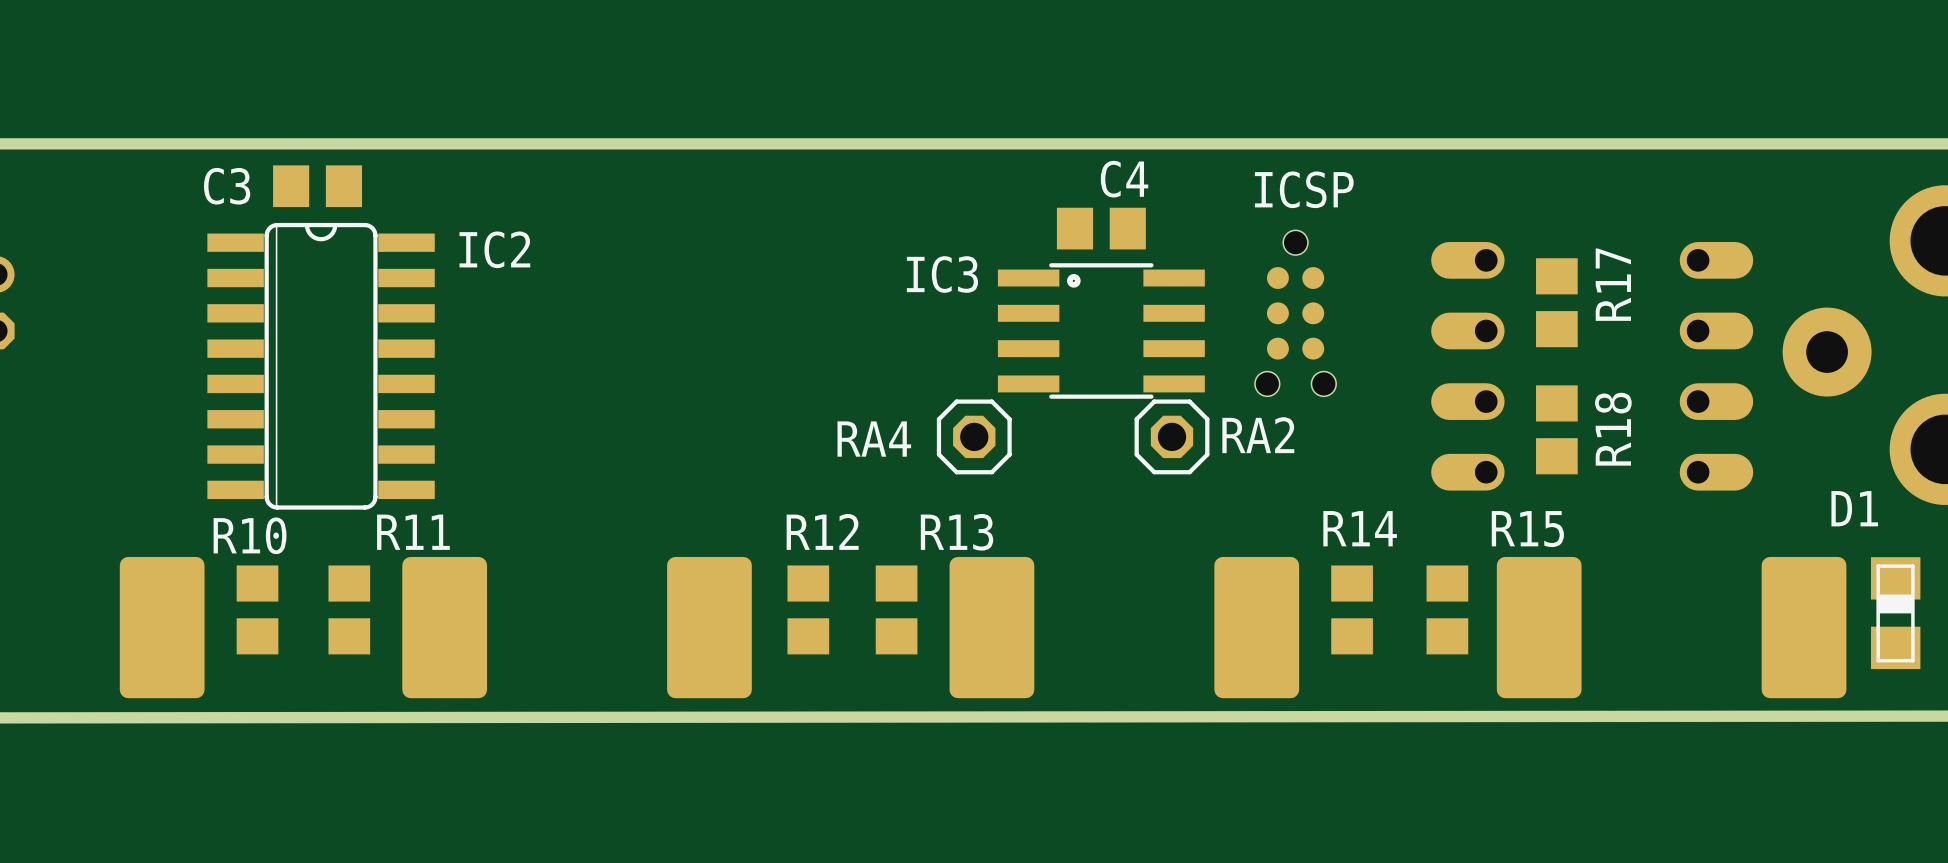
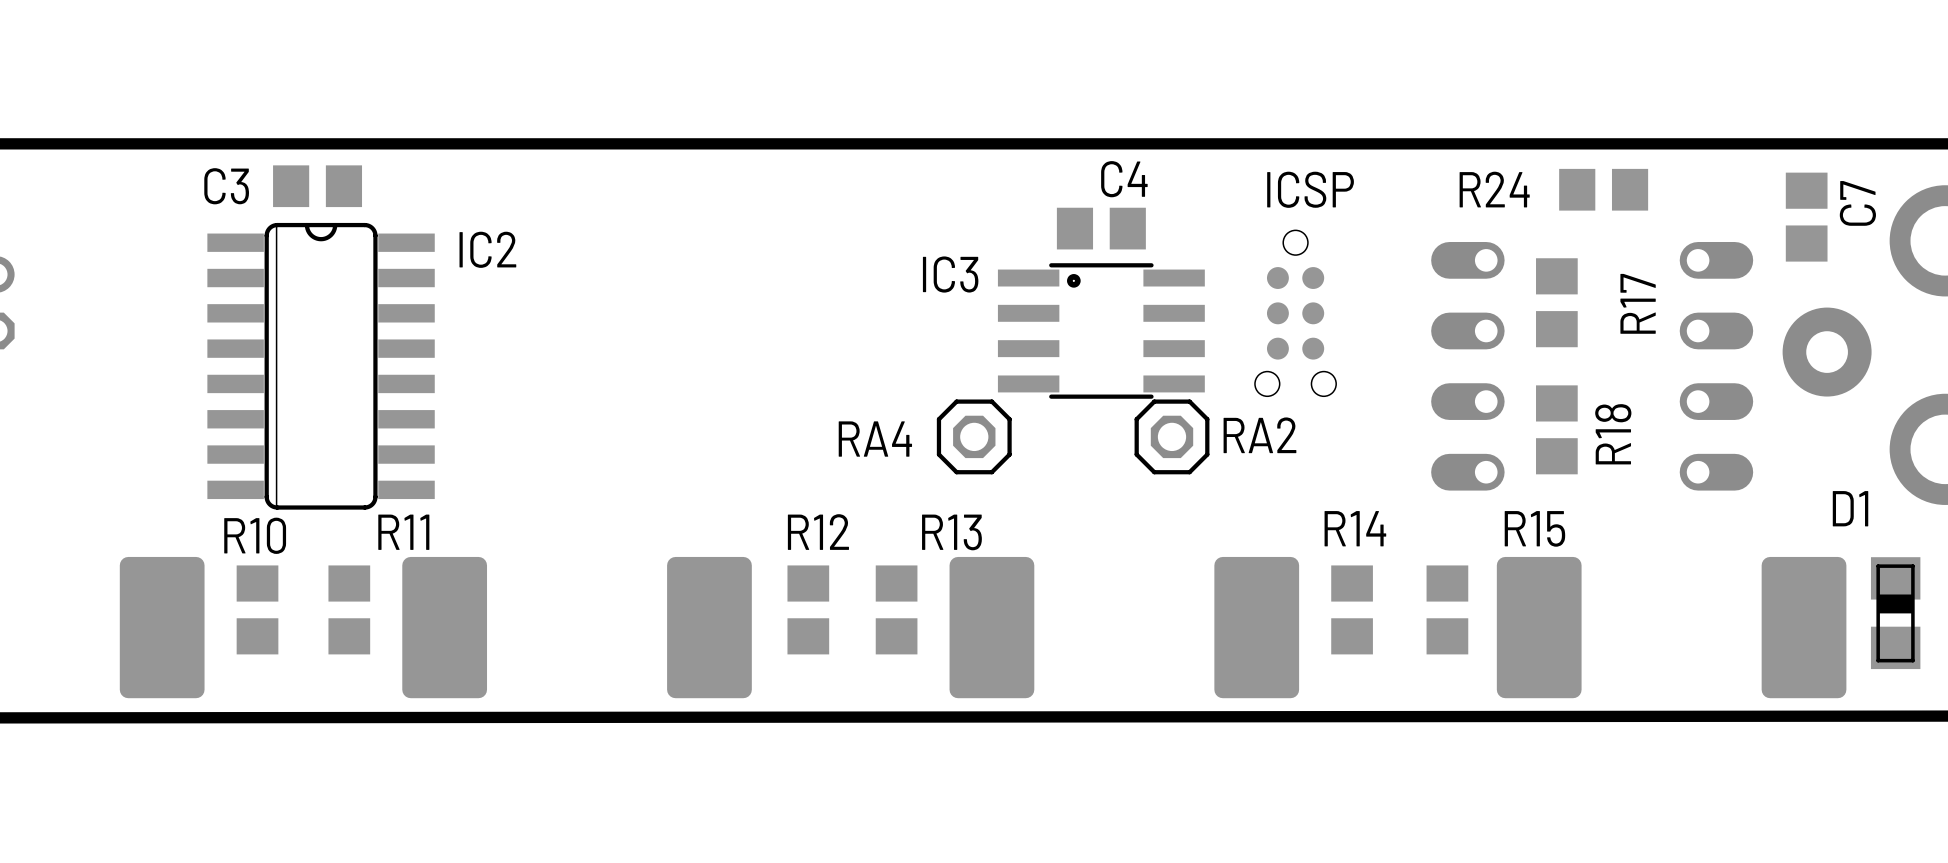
R24: none -> (1603, 189)
C7: none -> (1806, 217)
R17 name position: R17 (1613, 284) -> R17 (1638, 303)

